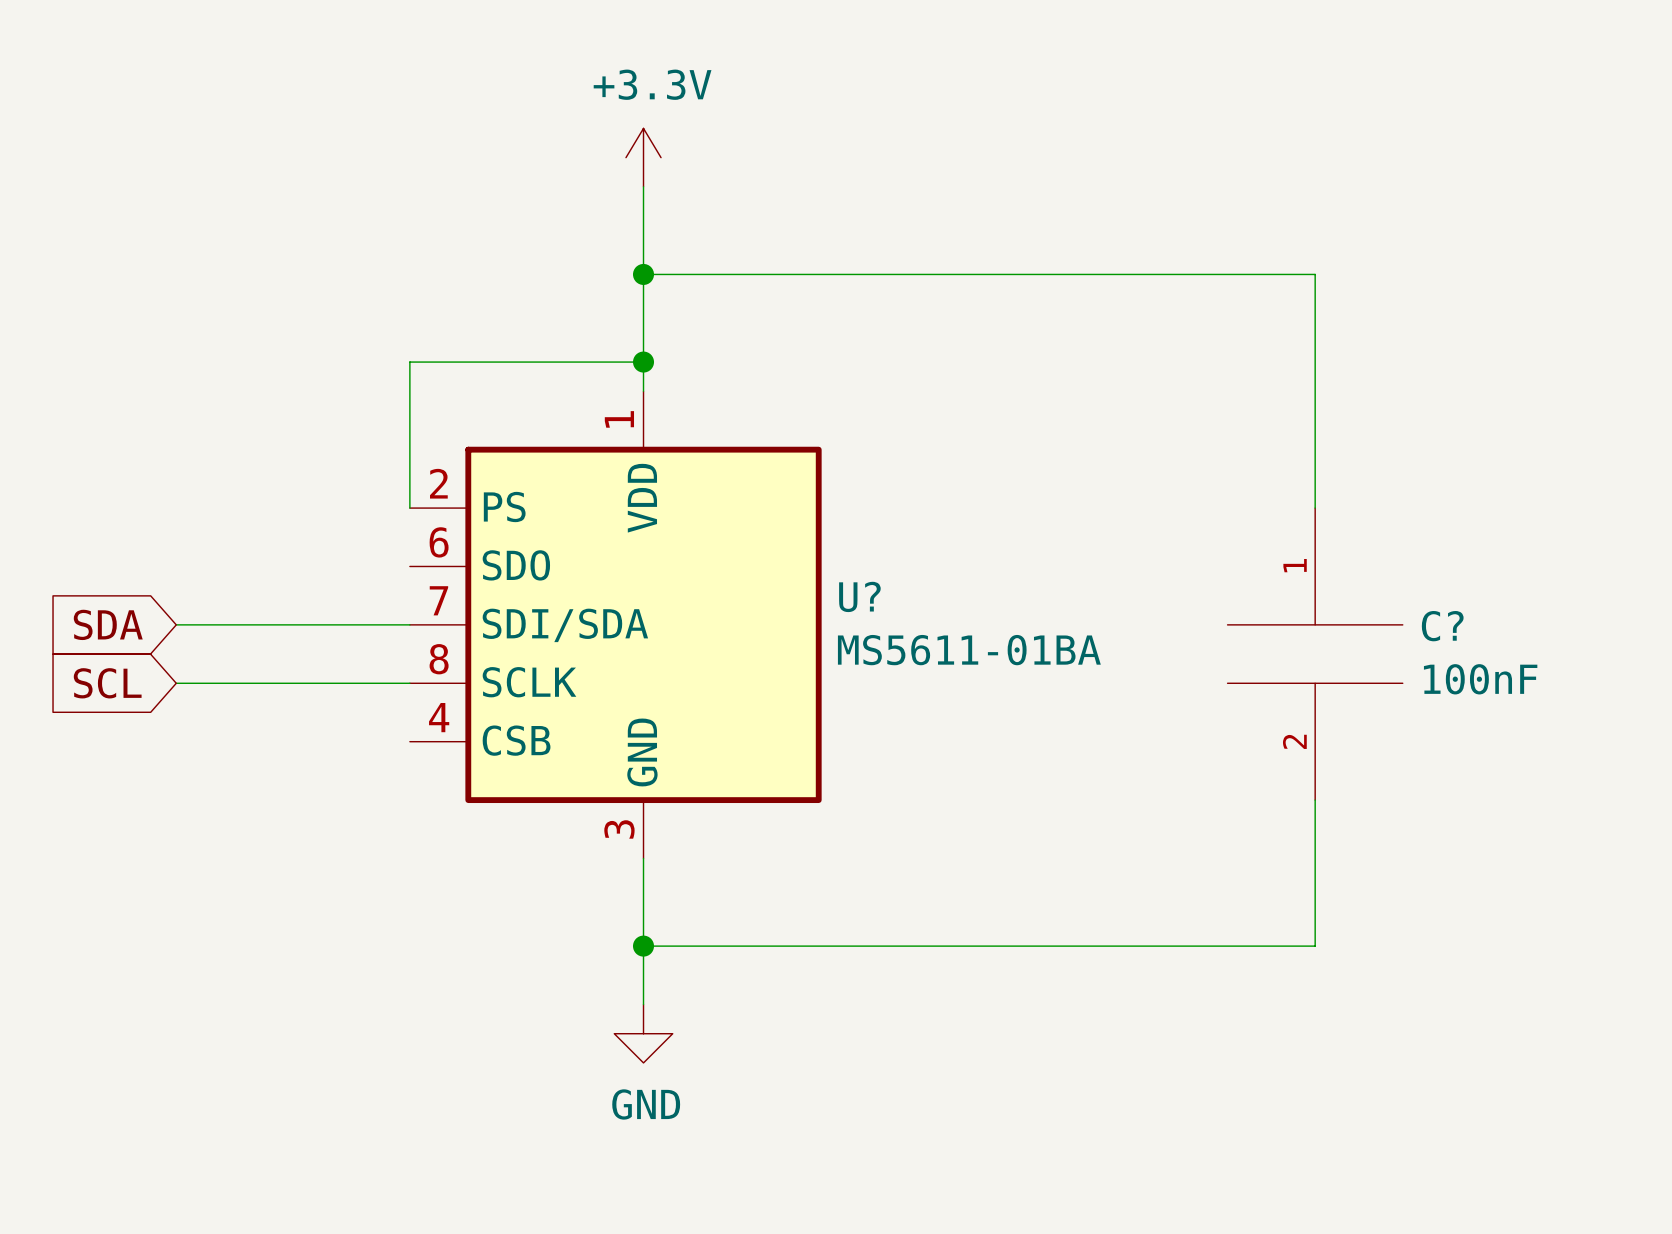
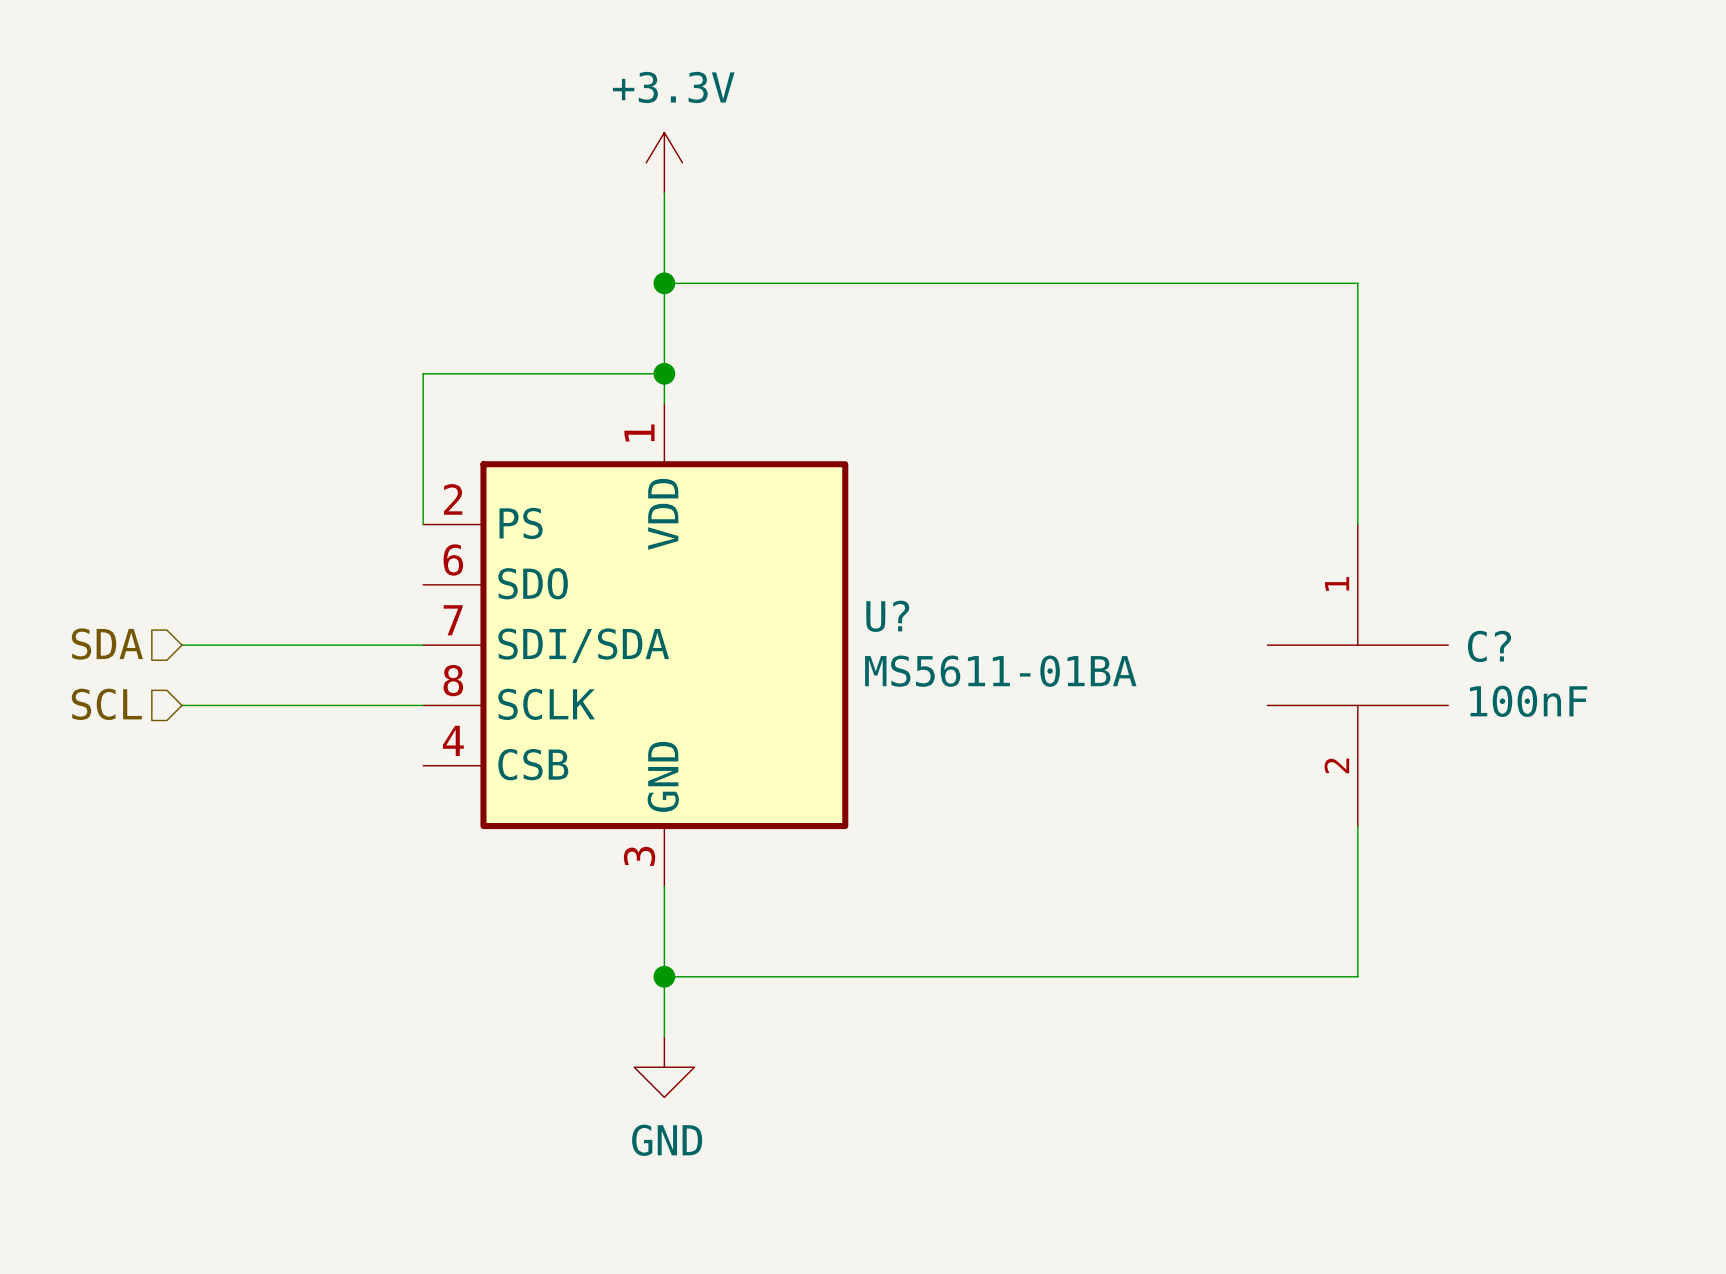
hierarchical label: none -> SDA (107, 644)
global label: SDA (108, 624) -> none
hierarchical label: none -> SCL (106, 704)
global label: SCL (107, 683) -> none

